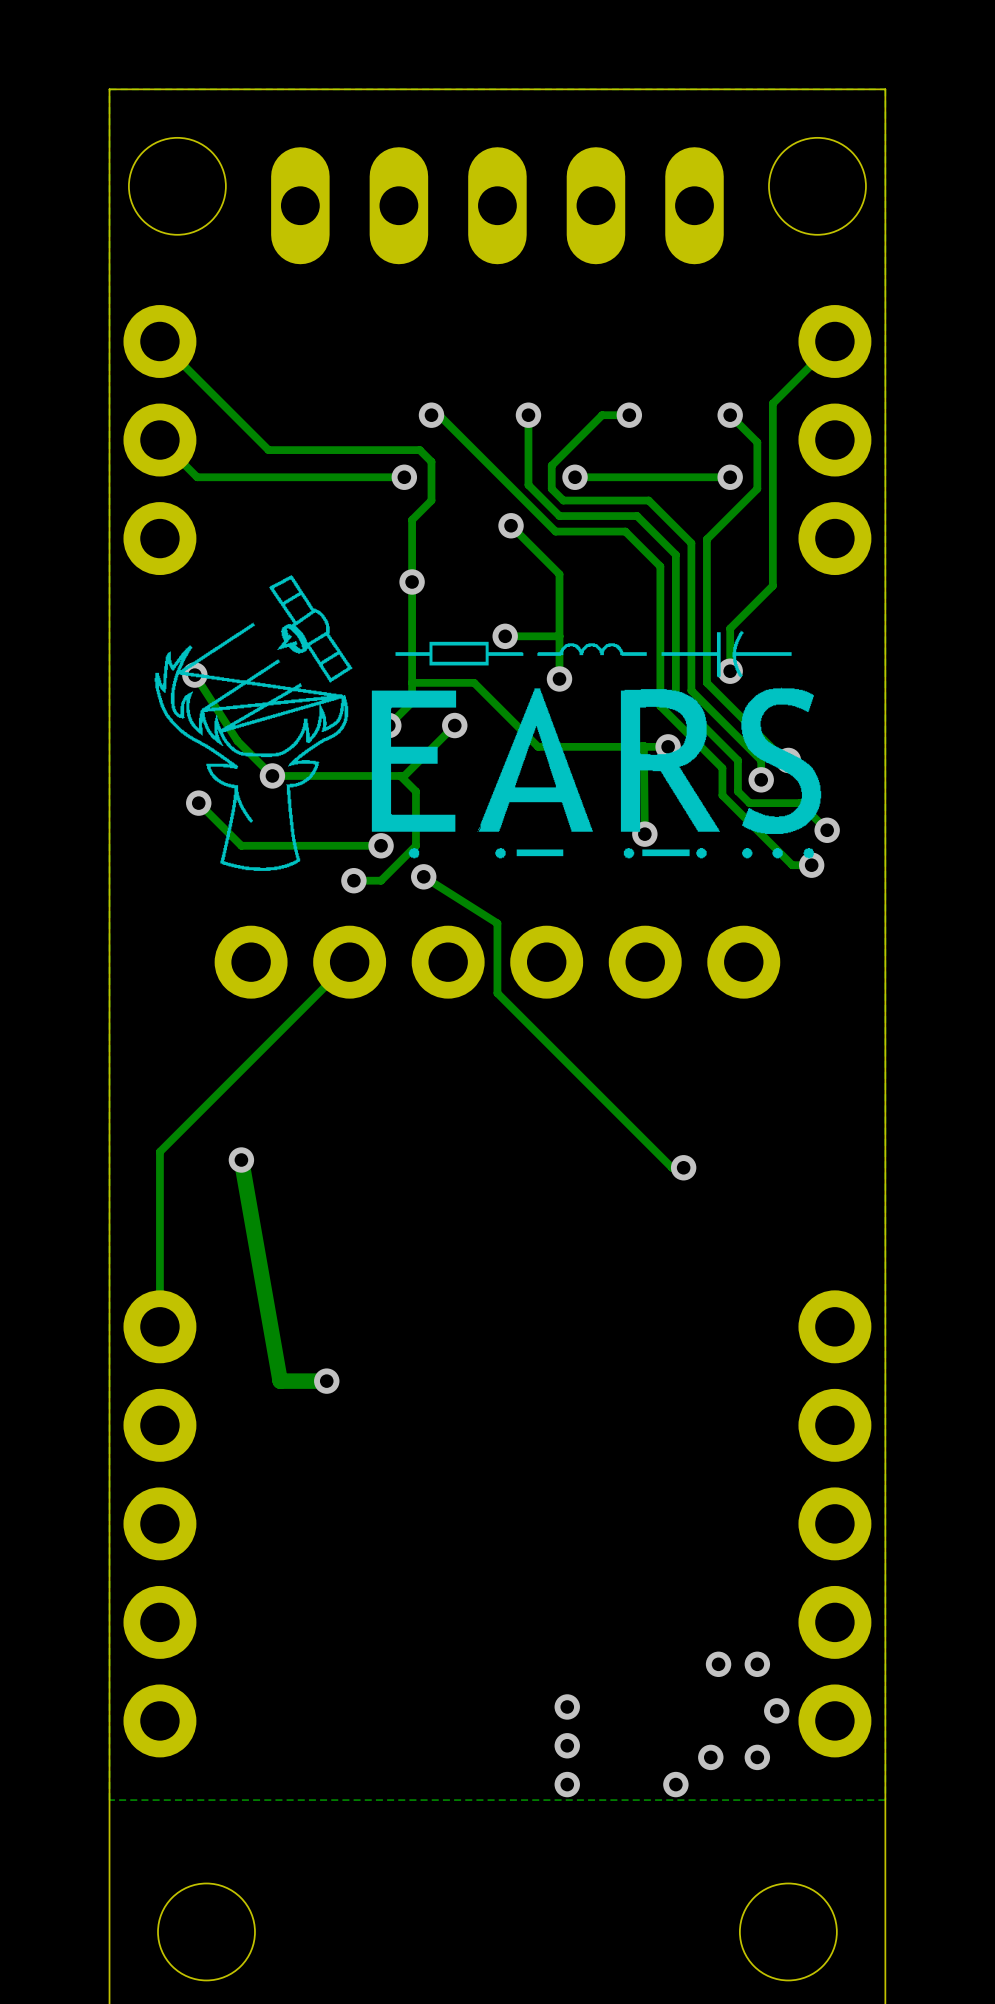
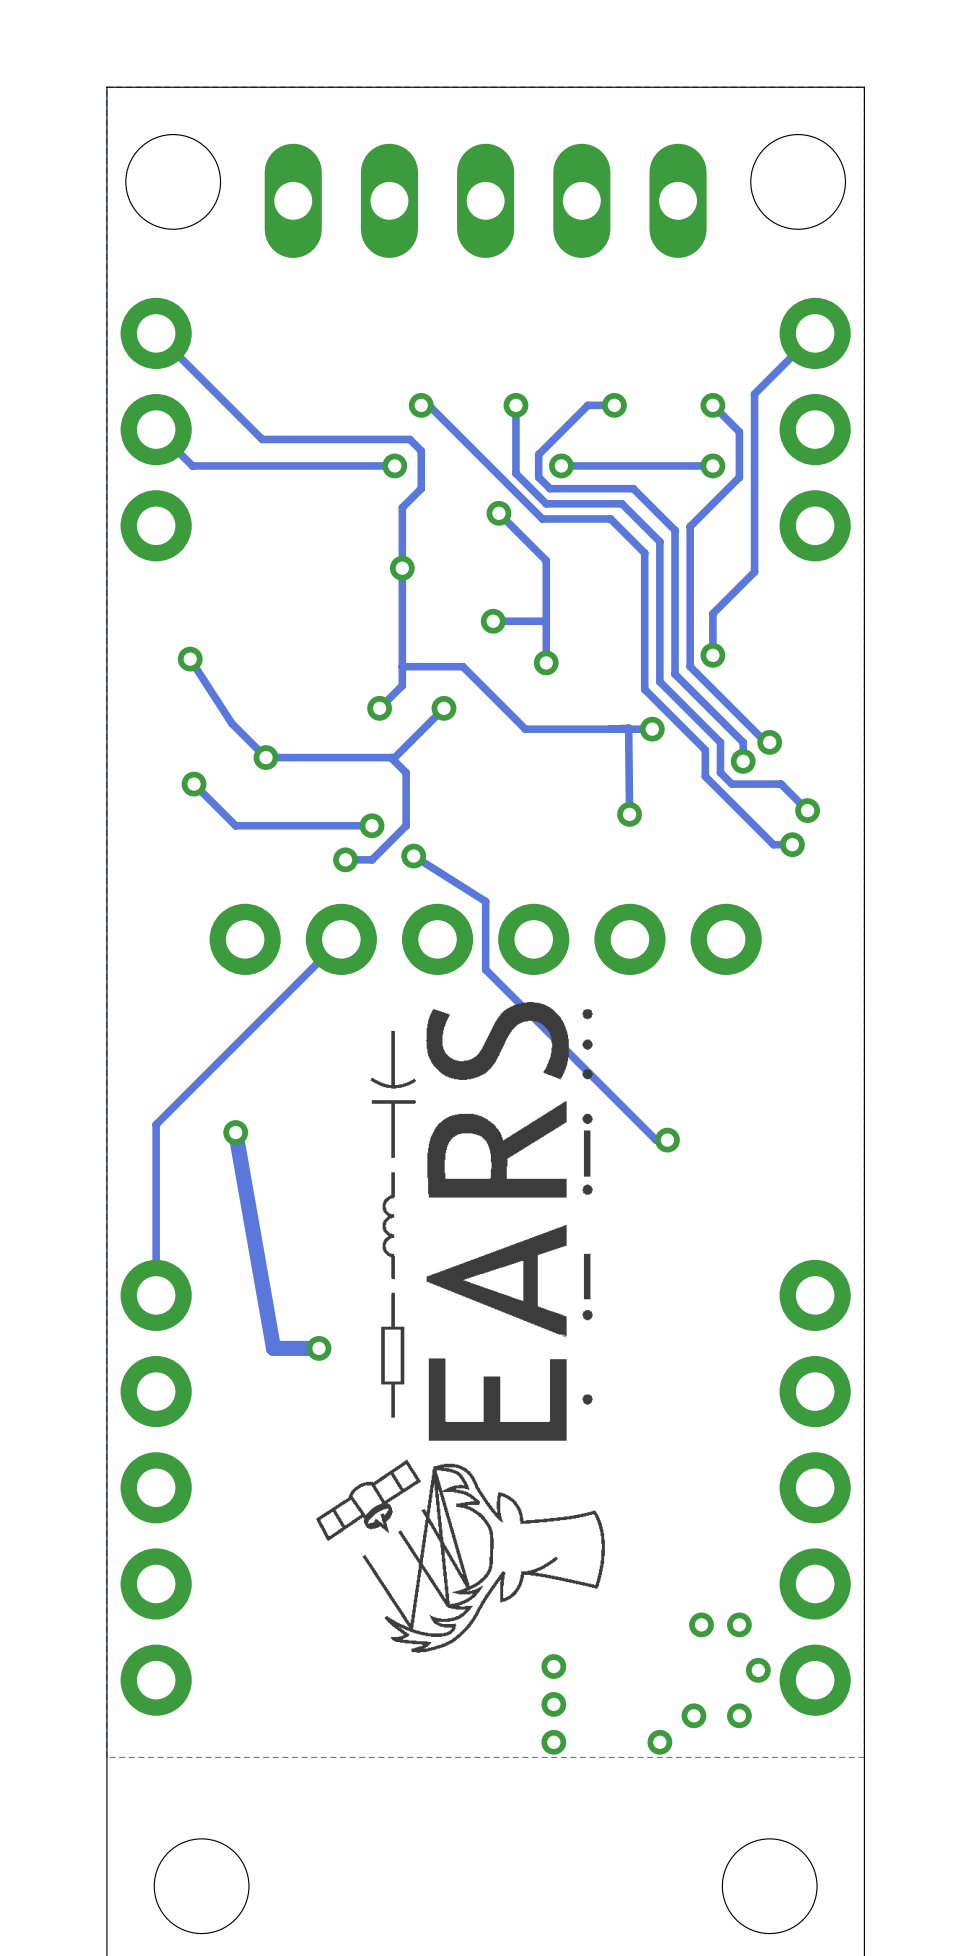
drawing: [154, 575, 822, 871] -> none
drawing: none -> [316, 1002, 605, 1653]

